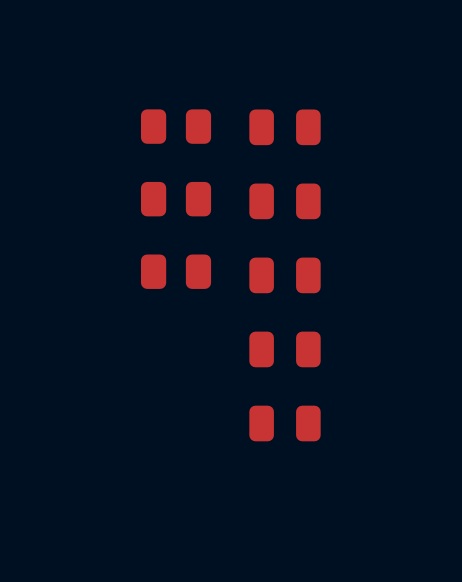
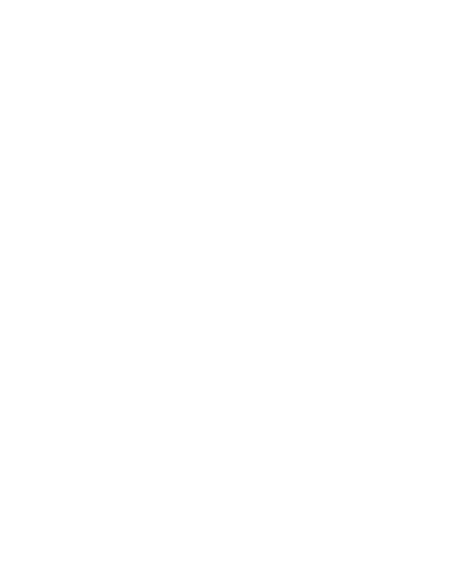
part: (176, 126) -> none
part: (285, 127) -> none
part: (176, 199) -> none
part: (285, 201) -> none
part: (176, 271) -> none
part: (285, 275) -> none
part: (285, 349) -> none
part: (285, 423) -> none

